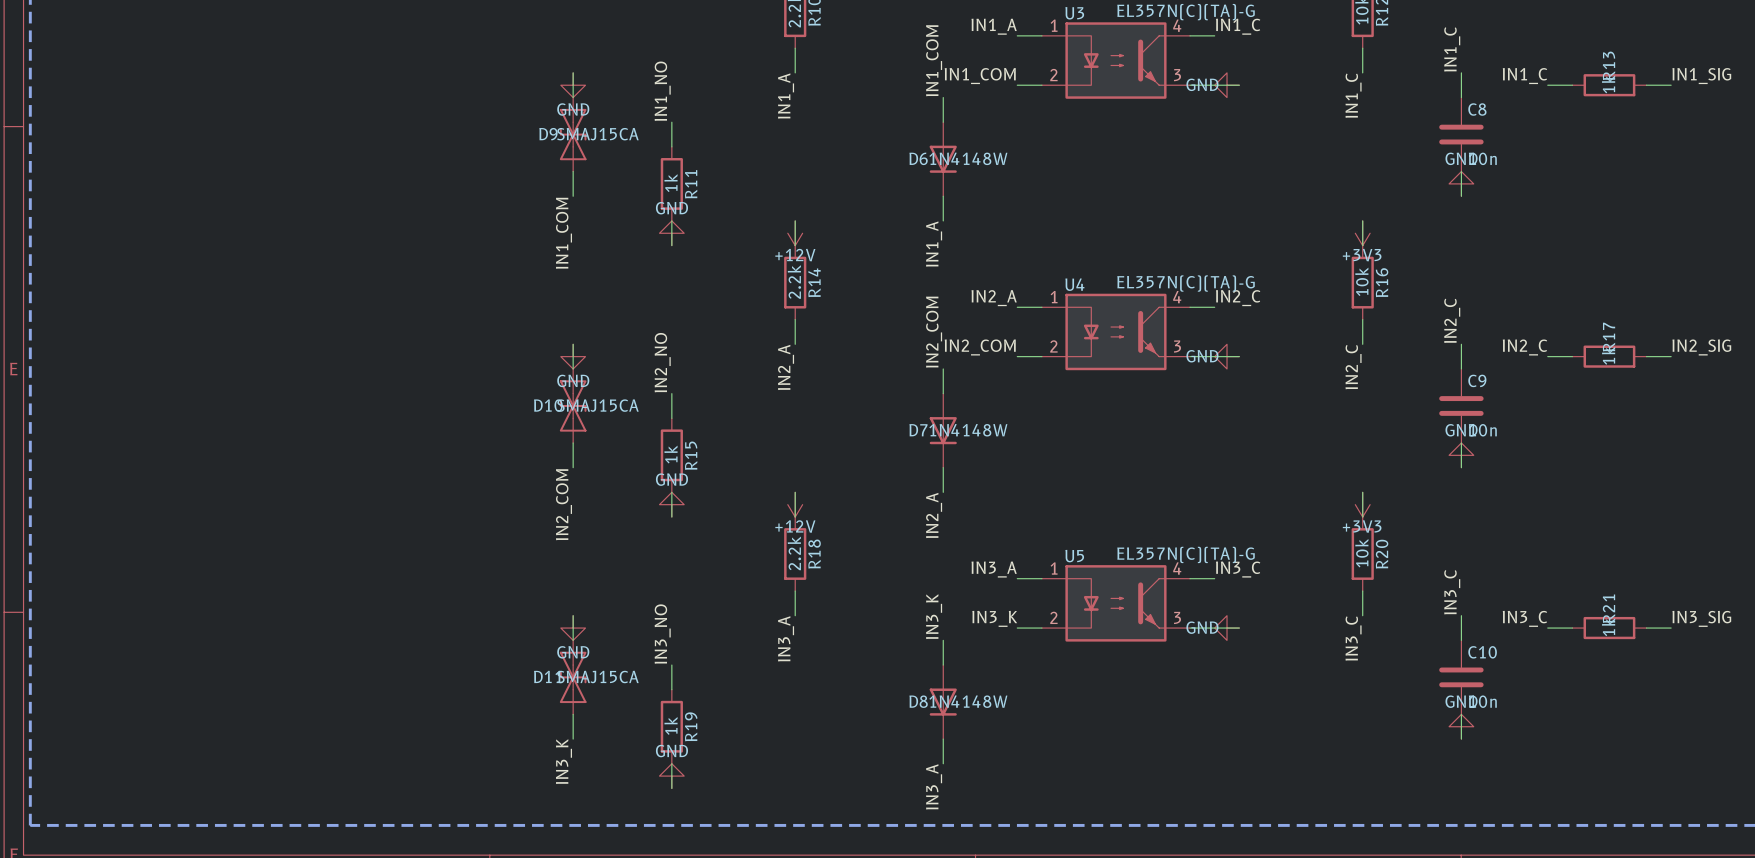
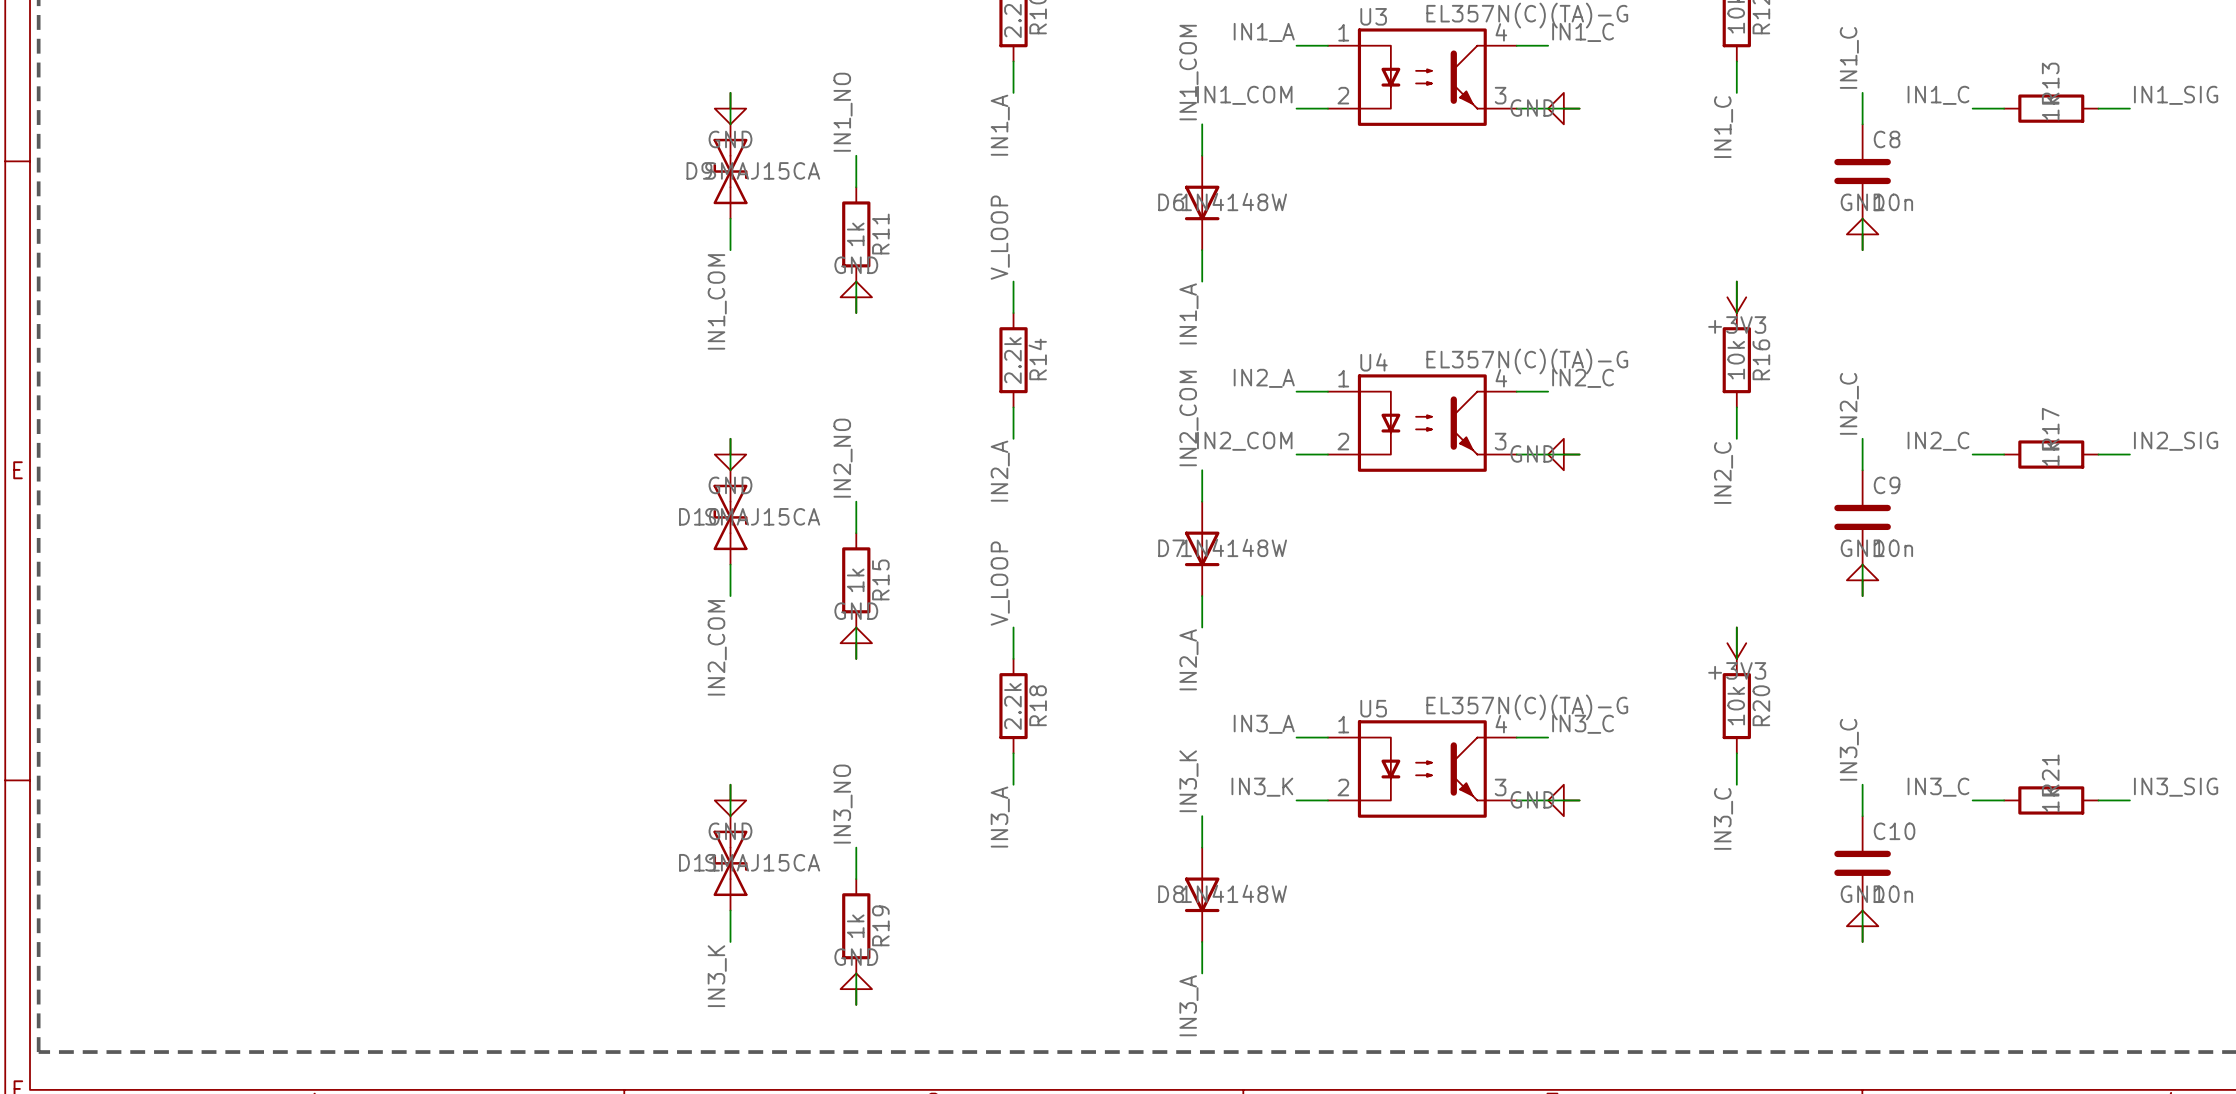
label: none -> V_LOOP (1000, 237)
power symbol: +12V (795, 233) -> none
label: none -> V_LOOP (1000, 583)
power symbol: +12V (795, 504) -> none

